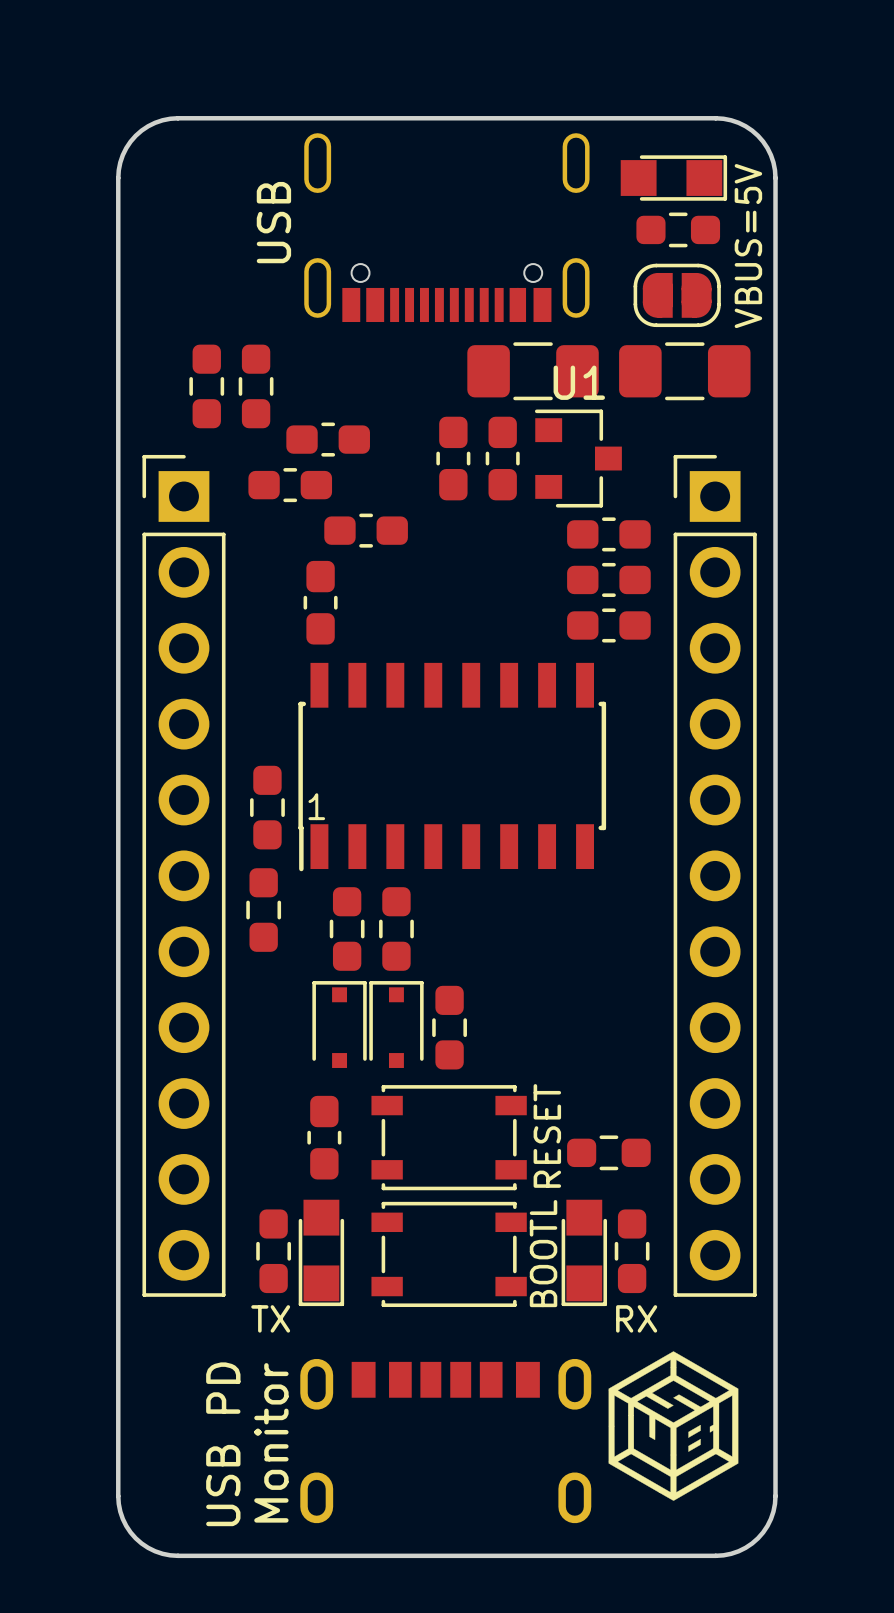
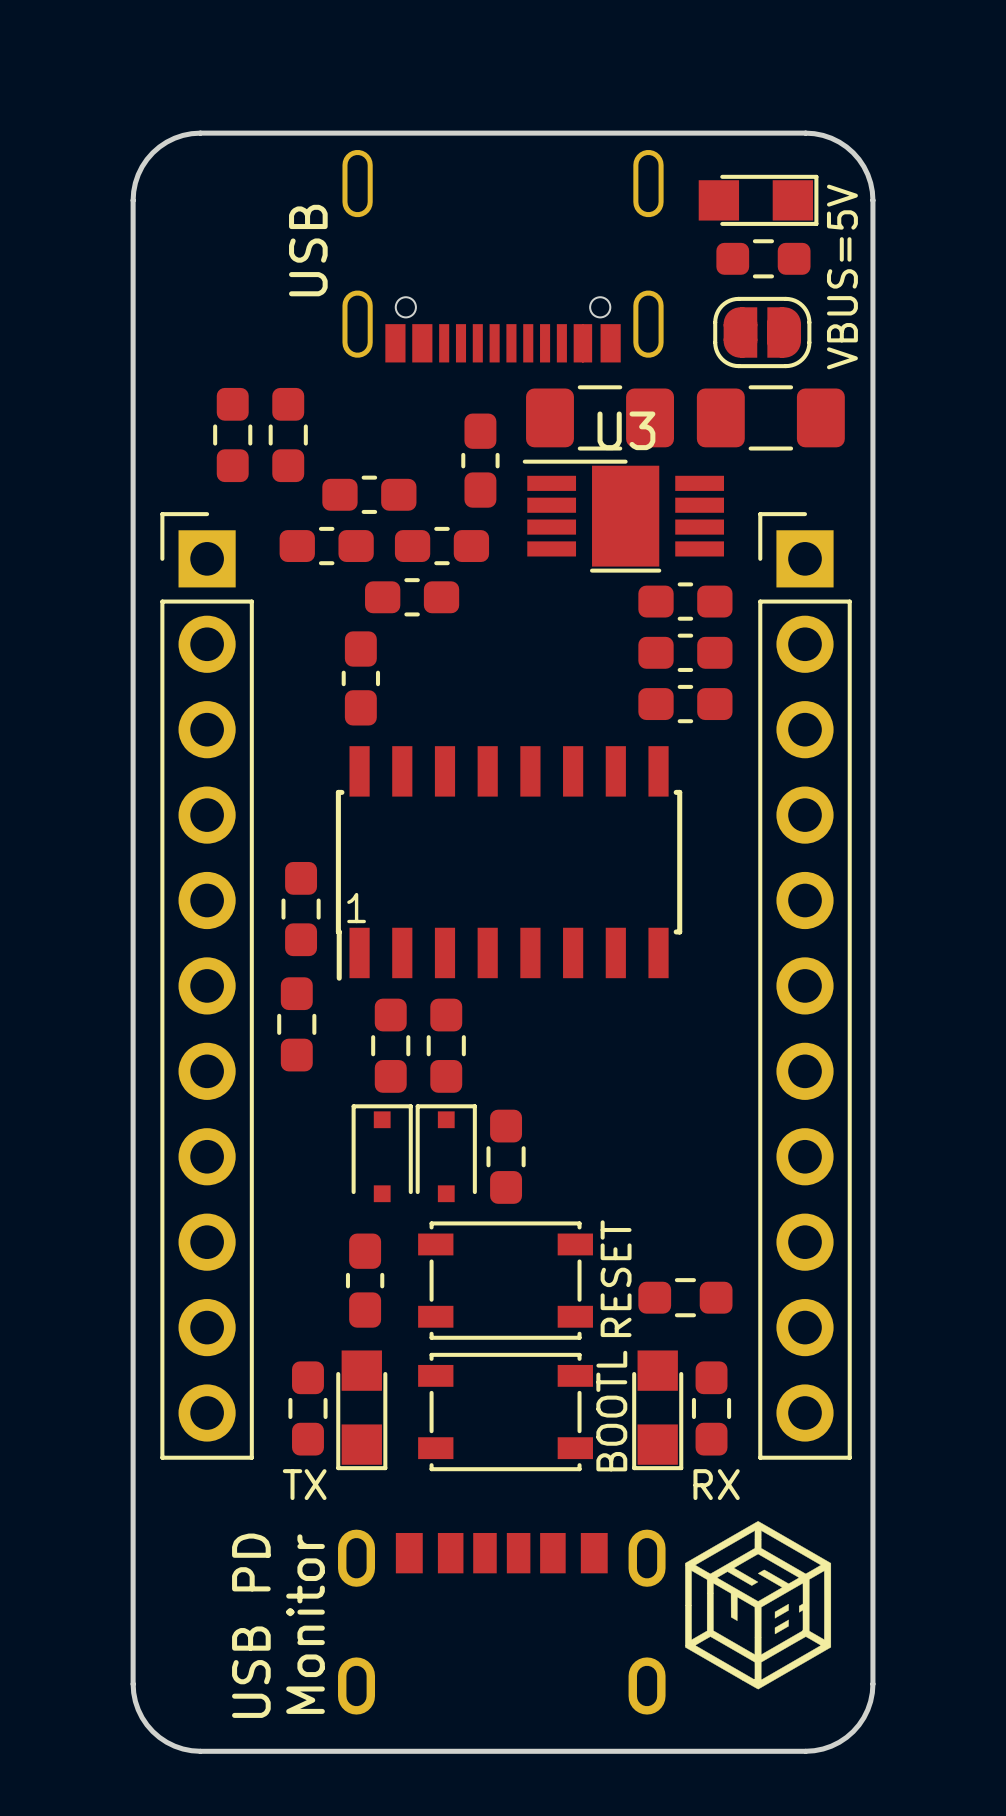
part: none -> (480, 460)
part: (453, 458) -> none
part: (502, 458) -> none
U3: none -> (623, 516)
U1: (578, 458) -> none
part: none -> (441, 546)

